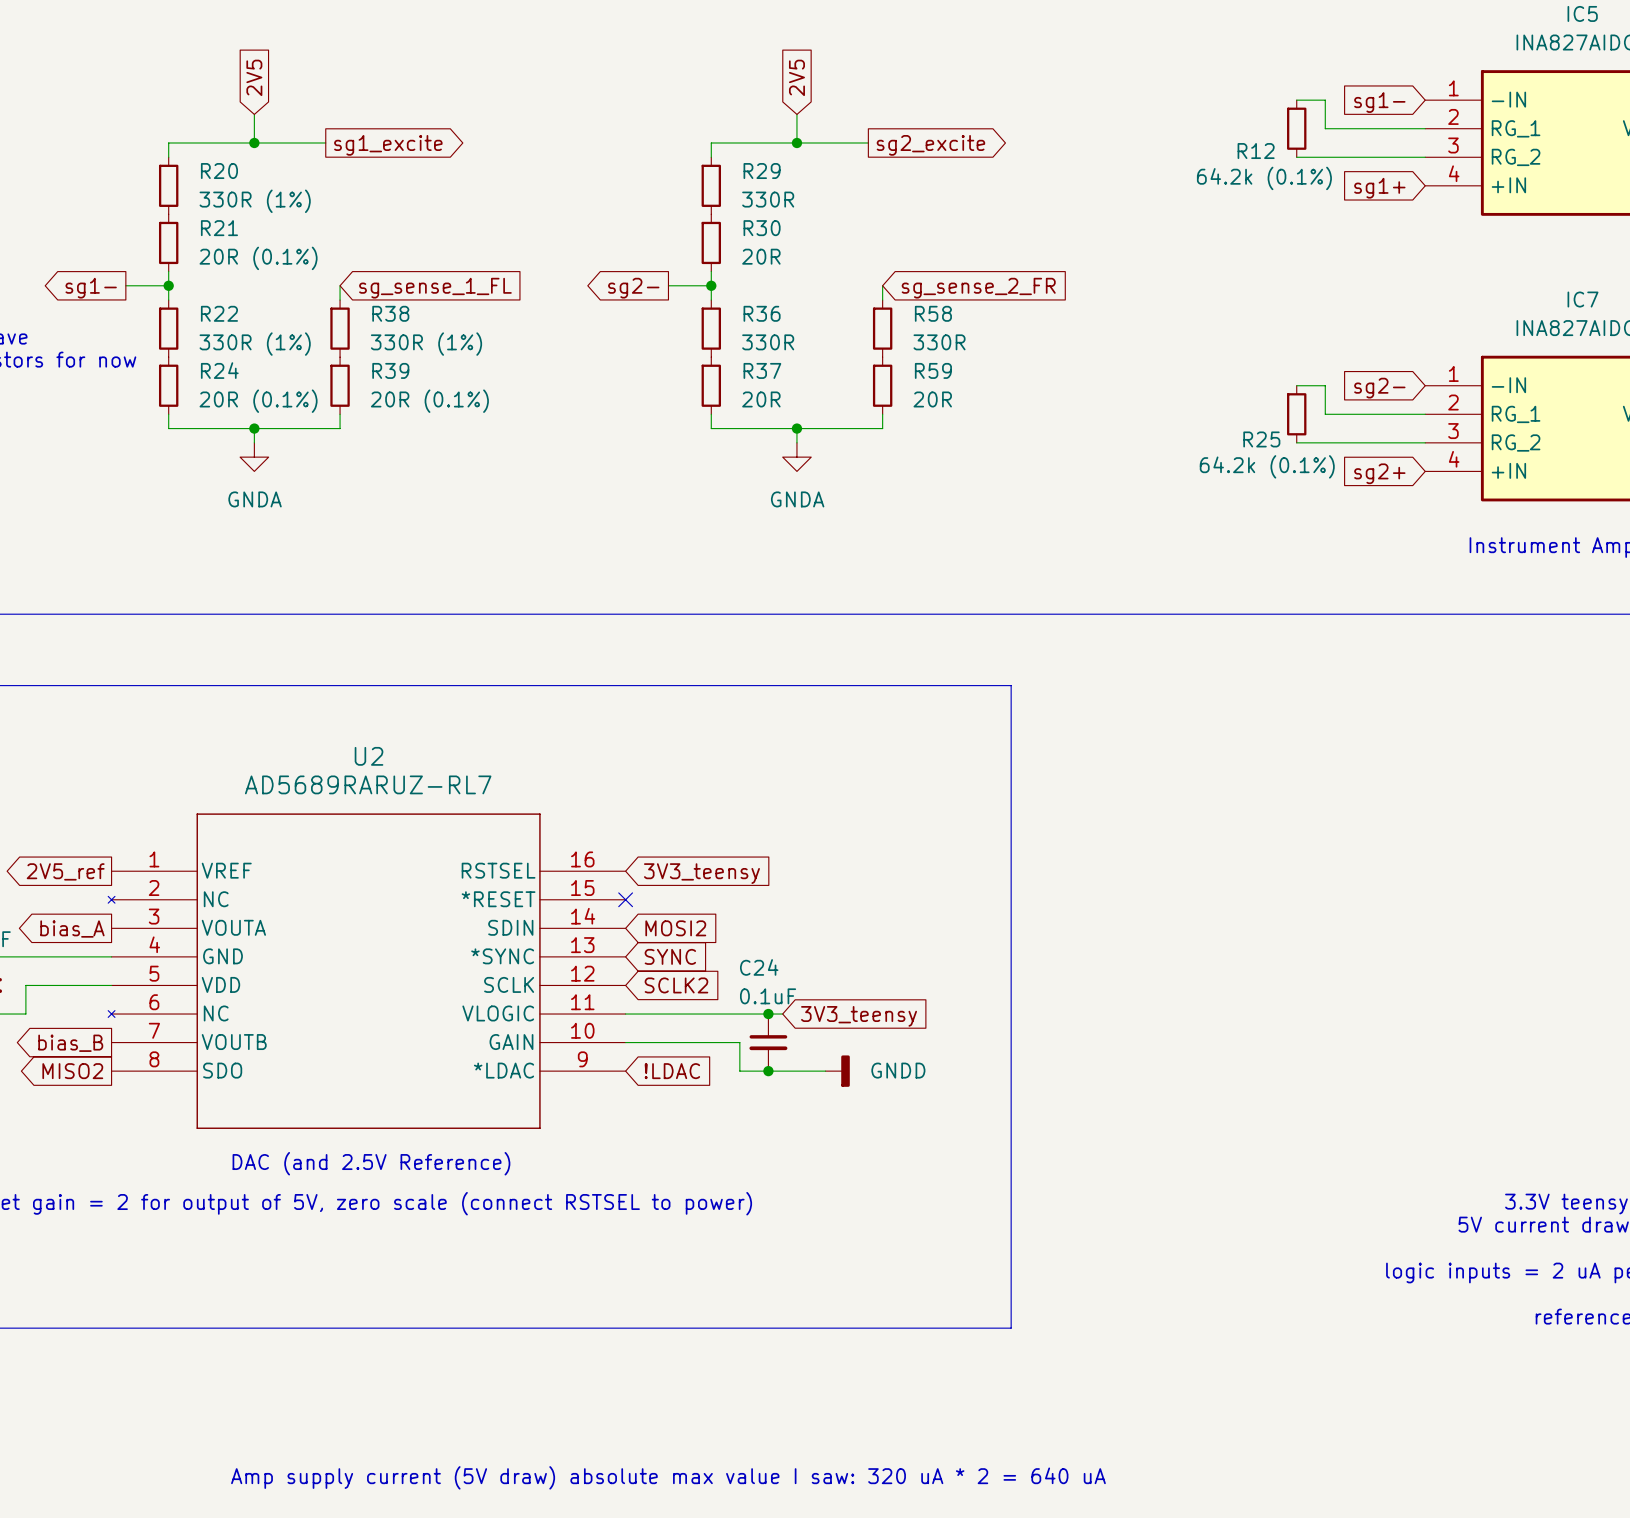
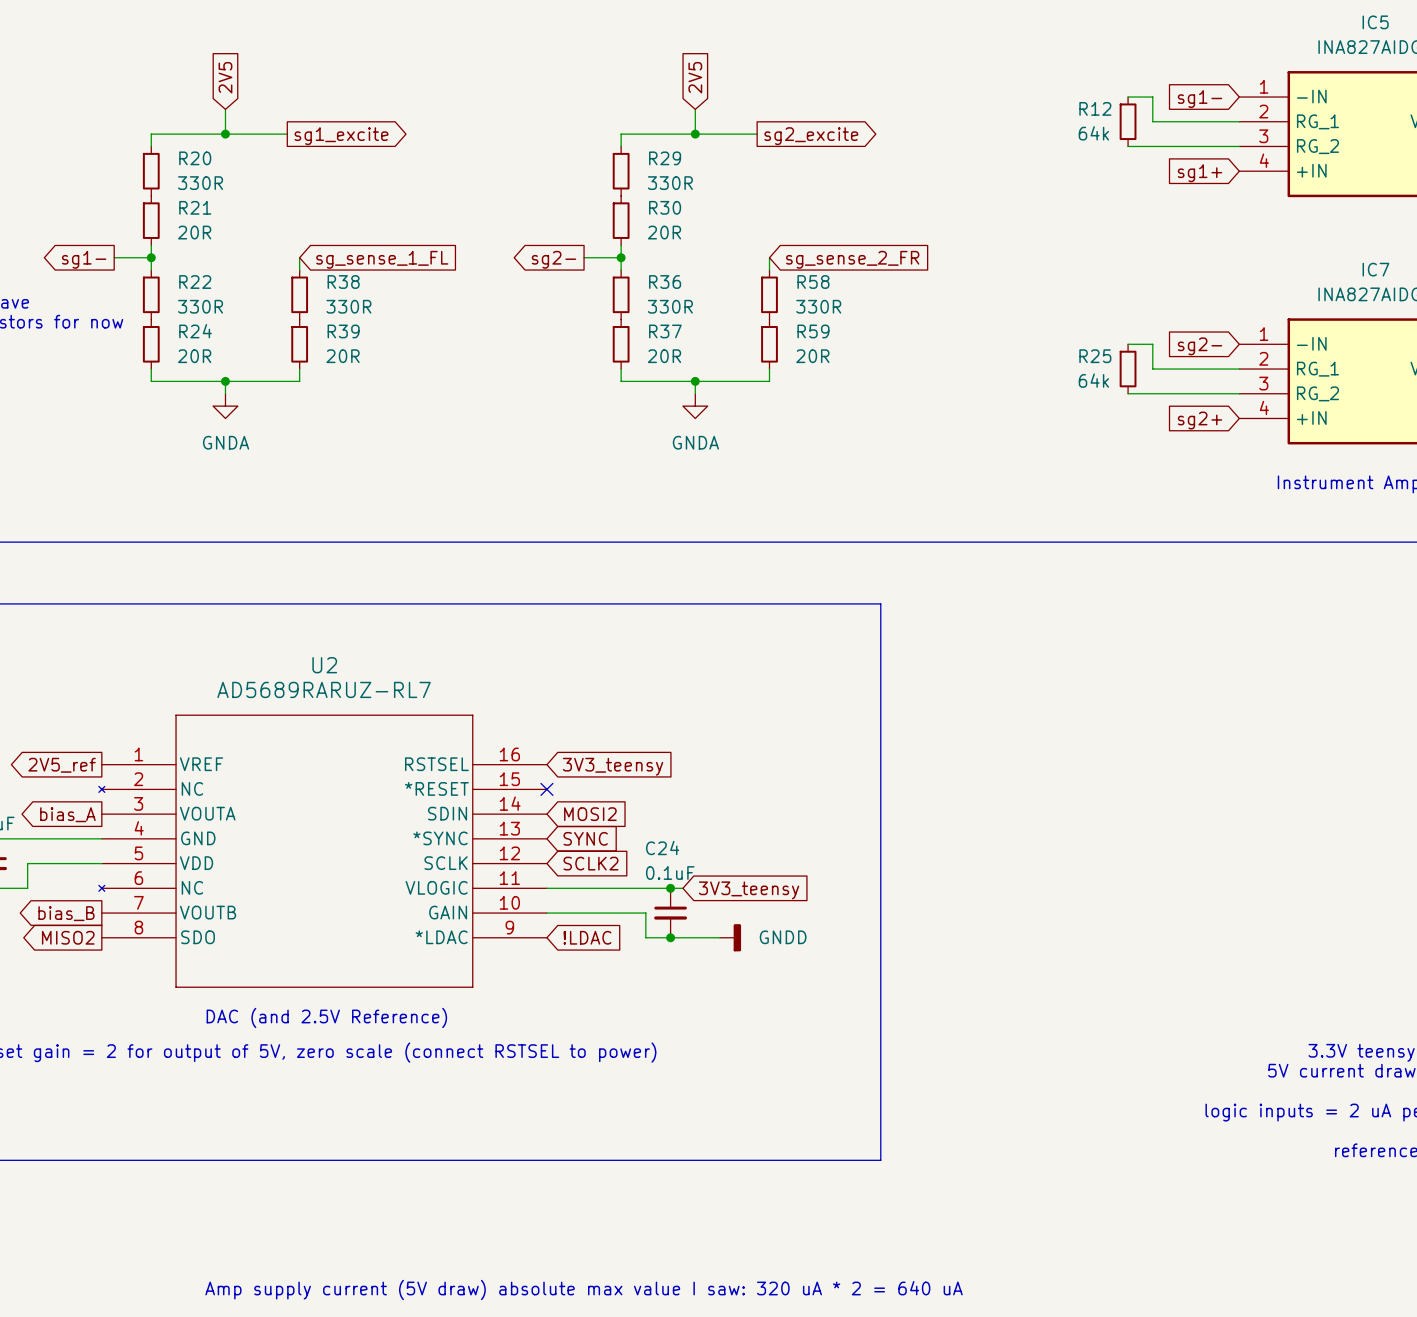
R12 name position: R12 (1256, 151) -> R12 (1095, 108)
R12 value: 64.2k (0.1%) (1264, 178) -> 64k (1093, 133)
R20 value: 330R (1%) (255, 201) -> 330R (200, 183)
R21 value: 20R (0.1%) (258, 258) -> 20R (194, 232)
R22 value: 330R (1%) (255, 344) -> 330R (200, 306)
R38 value: 330R (1%) (426, 344) -> 330R (348, 306)
R24 value: 20R (0.1%) (258, 401) -> 20R (194, 356)
R39 value: 20R (0.1%) (429, 401) -> 20R (343, 356)
R25 name position: R25 (1261, 439) -> R25 (1095, 356)
R25 value: 64.2k (0.1%) (1267, 466) -> 64k (1093, 380)

